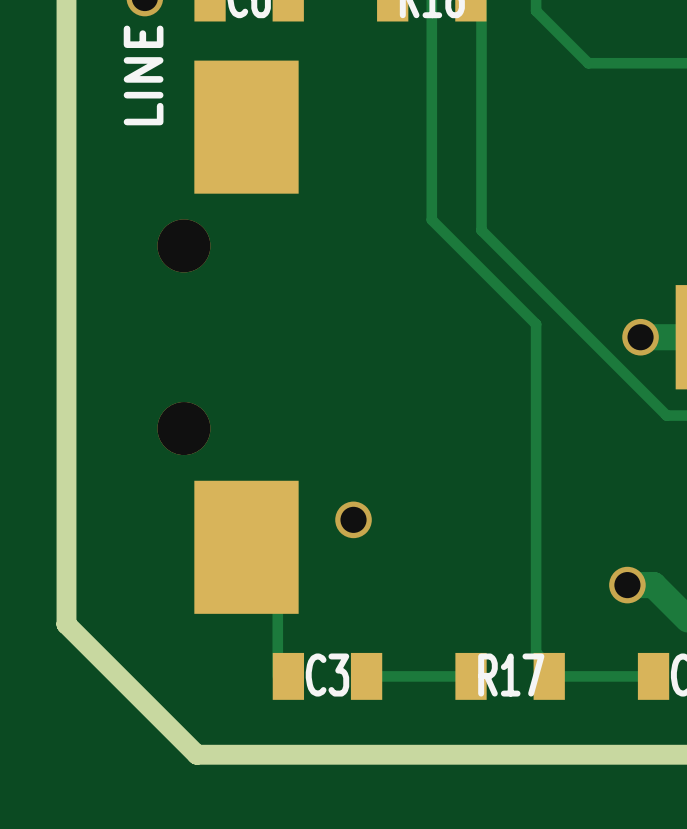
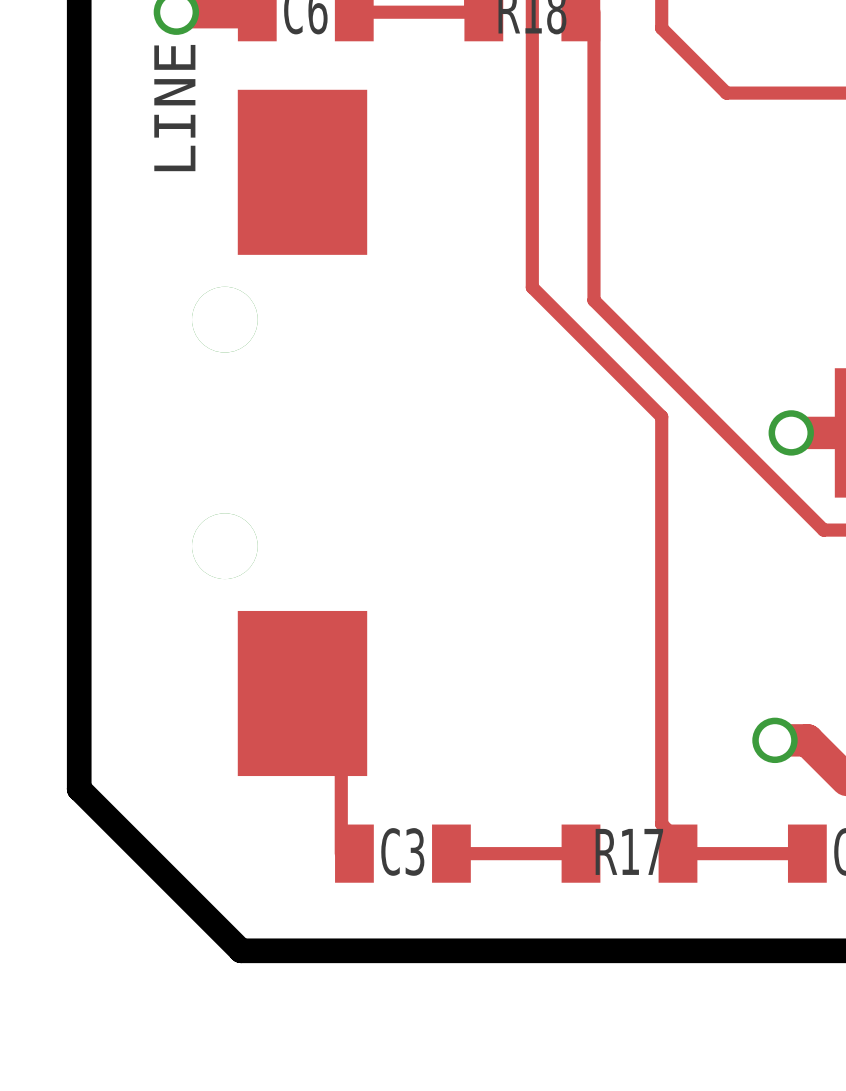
via: (353, 519) -> none

